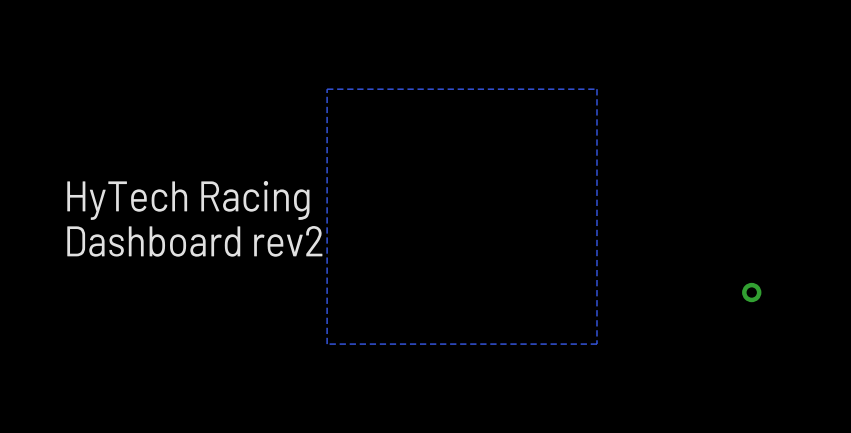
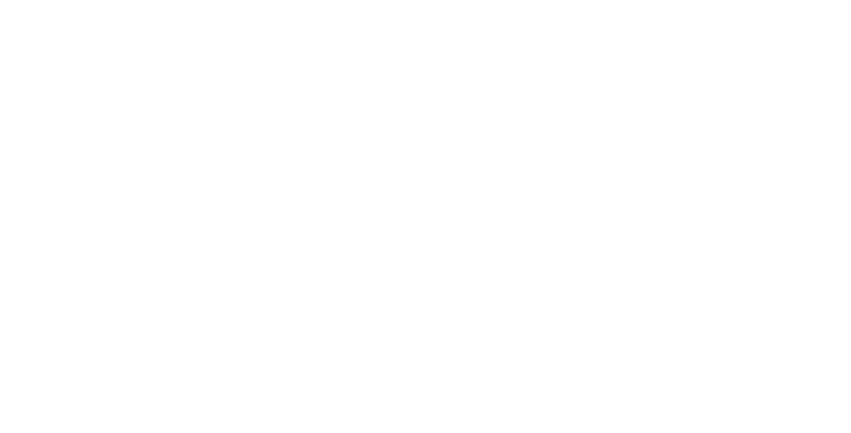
bottom zone outline: (327, 89) (596, 89) (596, 344) (327, 344) (327, 89) -> none
text: HyTech Racing (188, 200) -> none
text: Dashboard rev2 (194, 241) -> none
via: (751, 292) -> none

